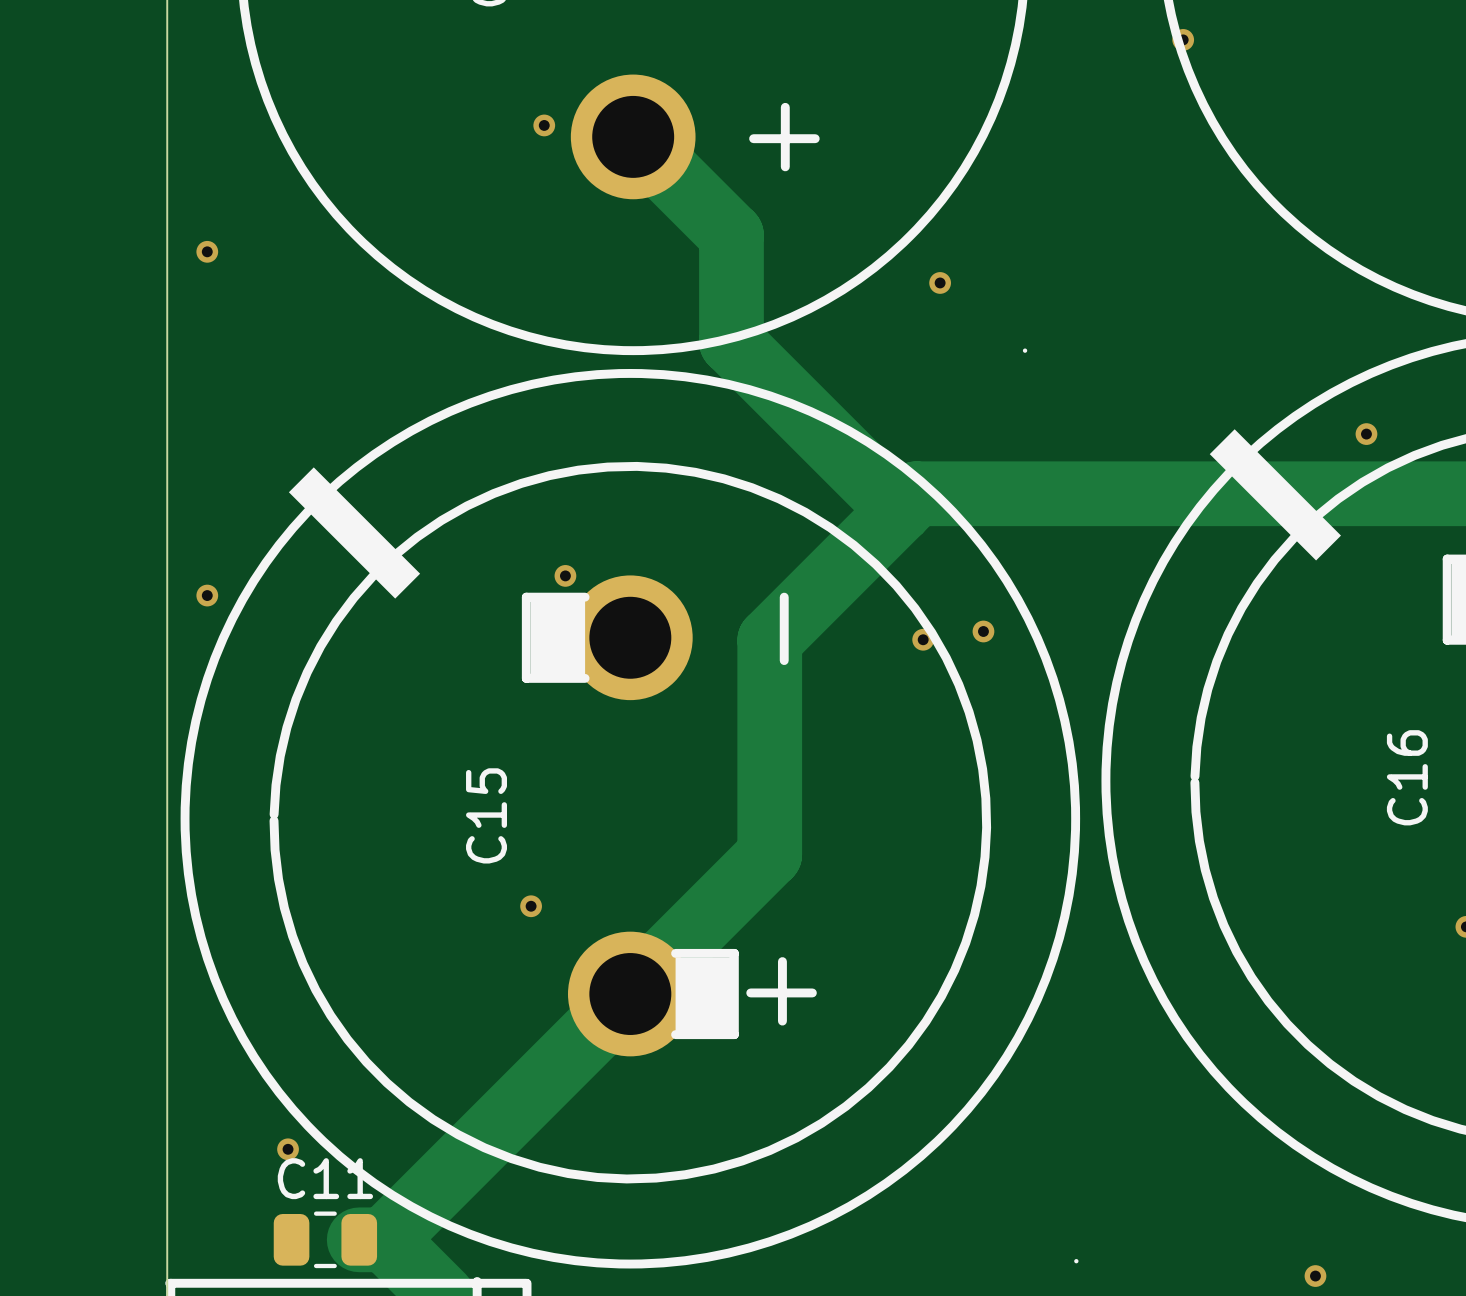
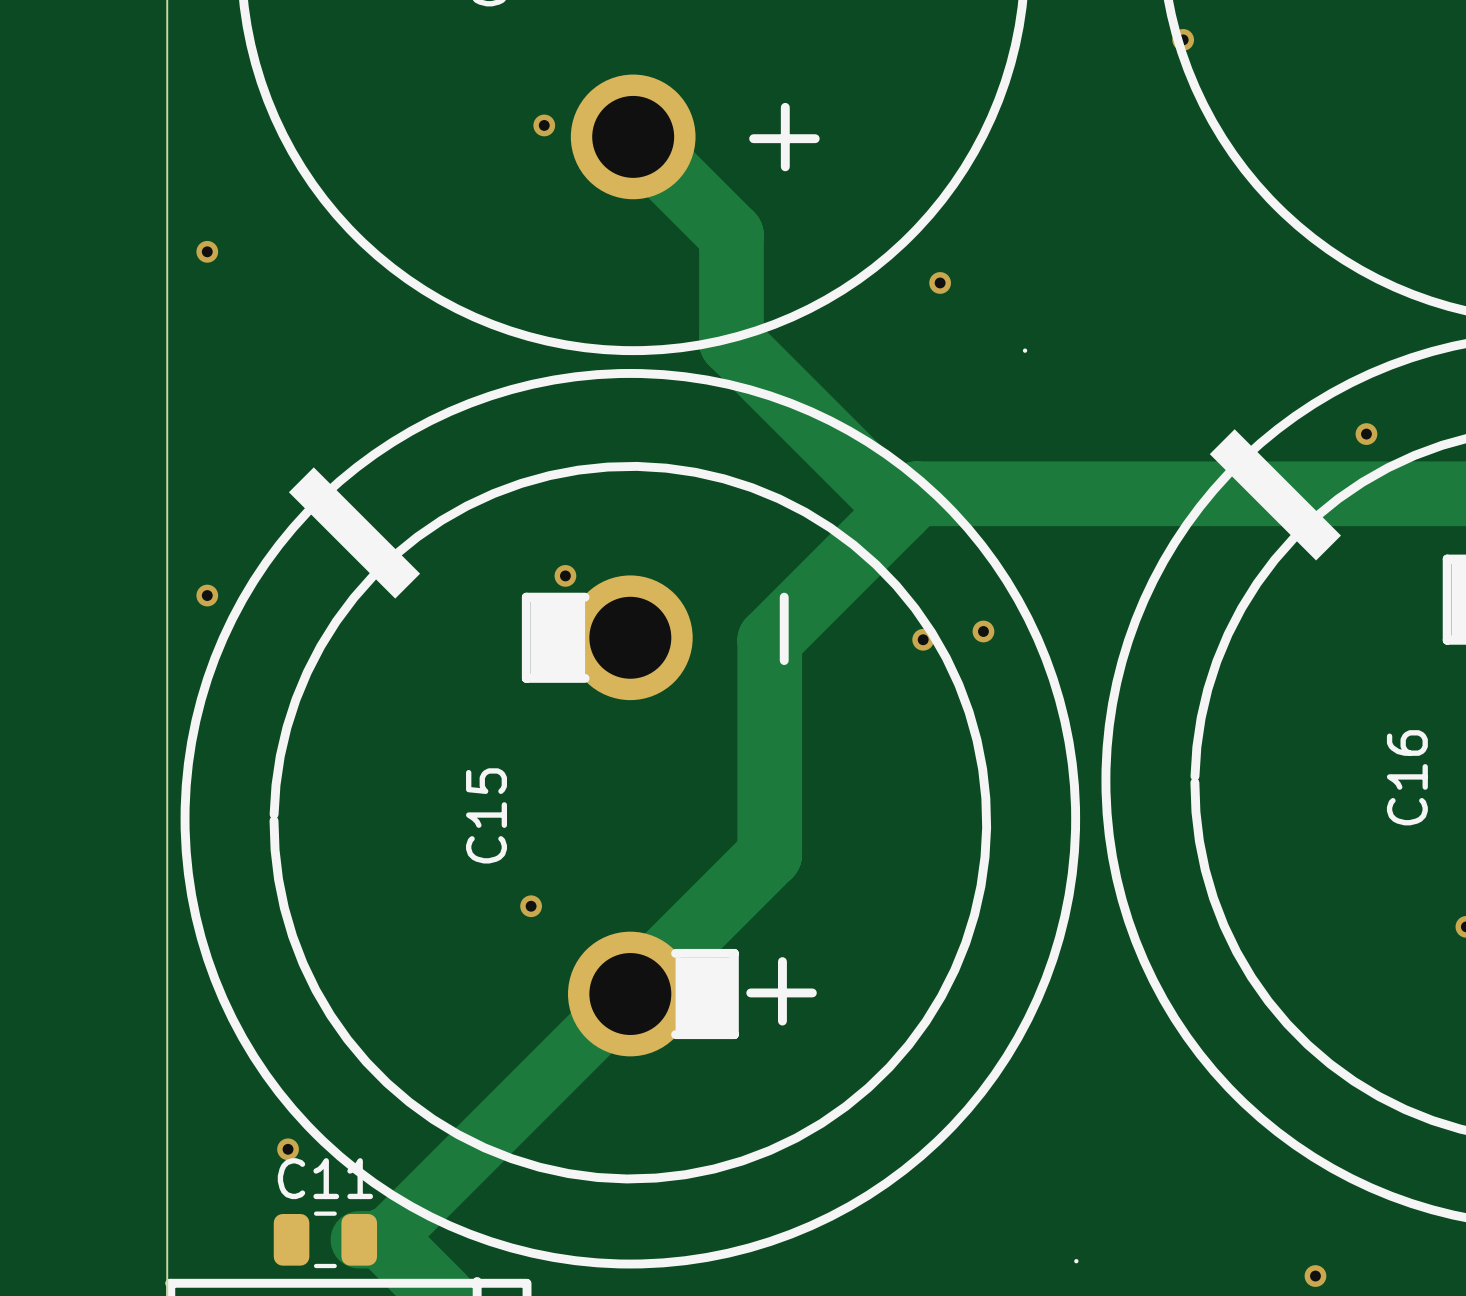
track width: thick (608, 1016) (384, 1239) (359, 1239) -> thin (608, 1016) (384, 1239) (359, 1239)

